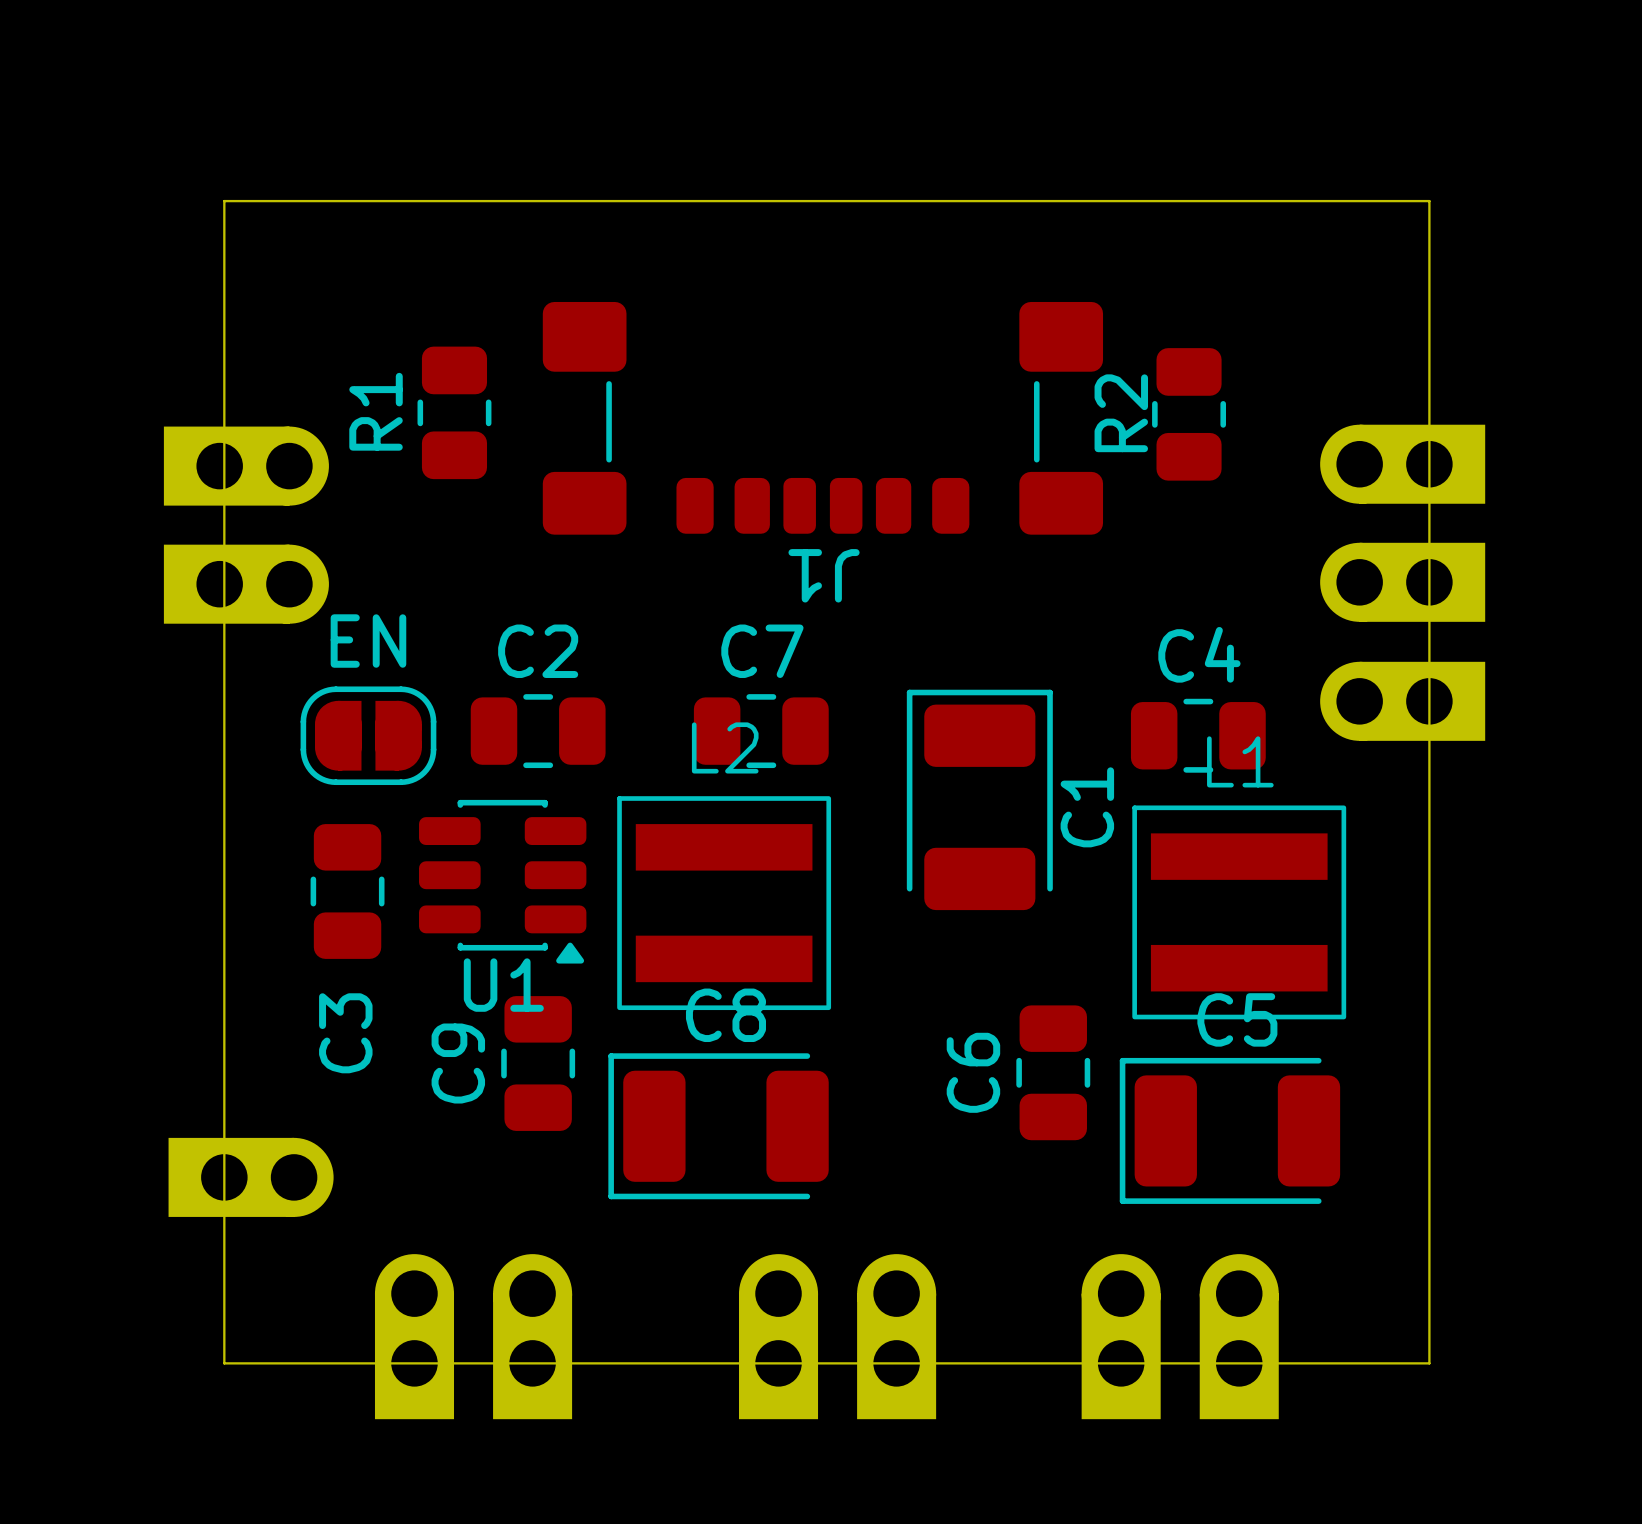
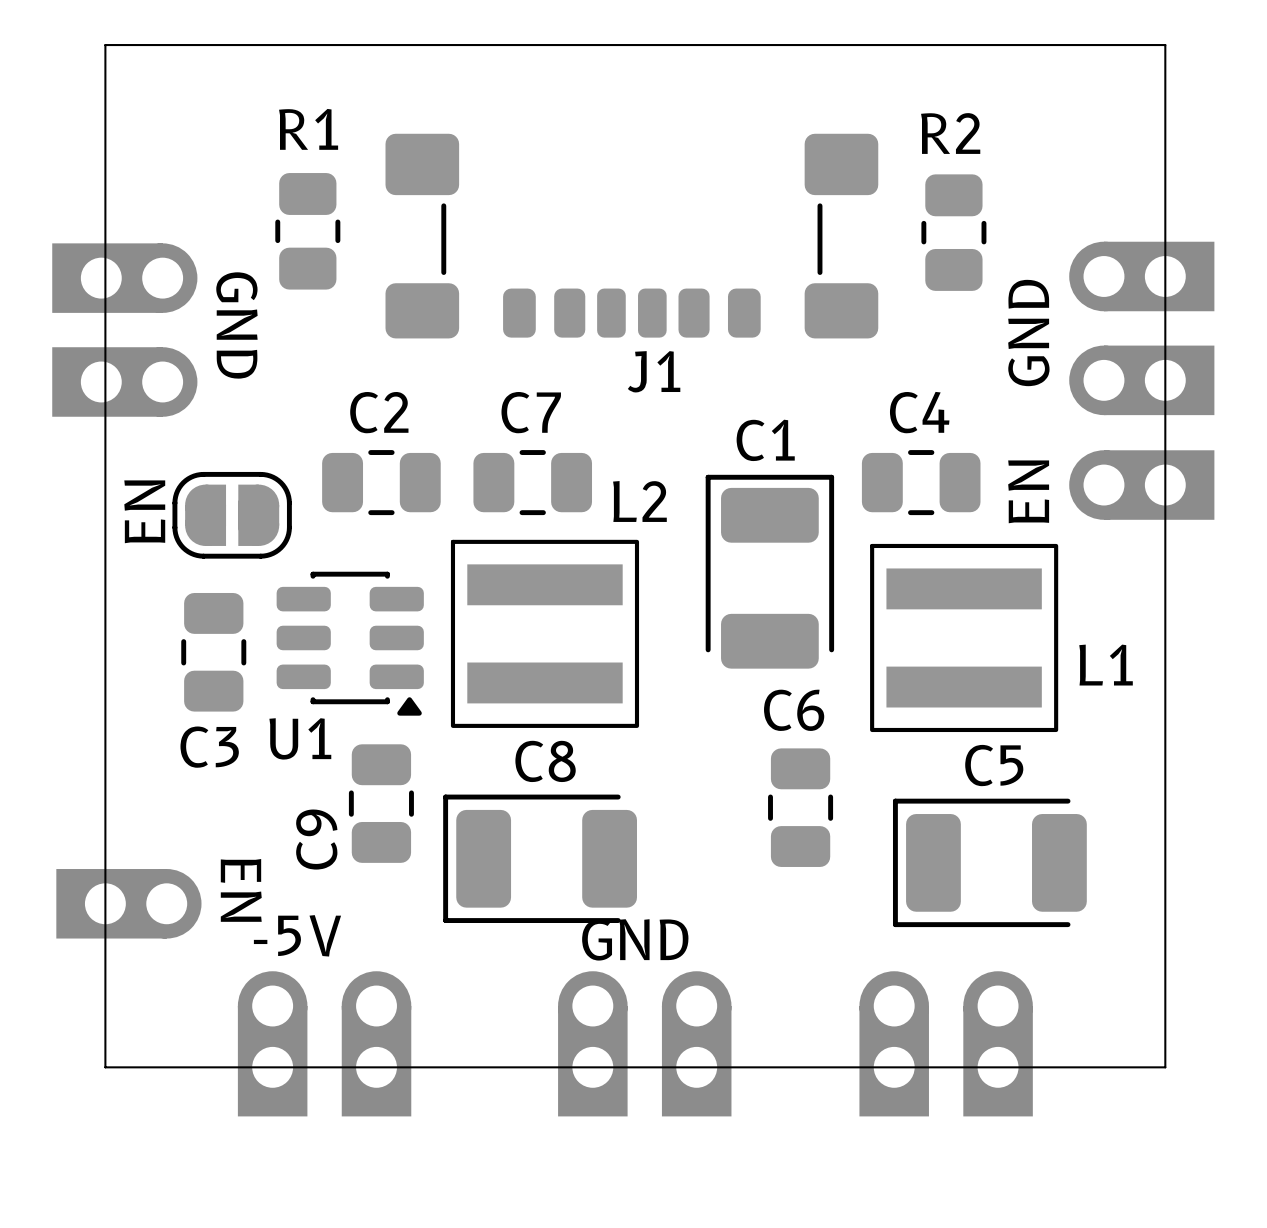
R1 name rotation: 0° (376, 411) -> 90° clockwise (308, 129)
R1 name position: R1 (376, 411) -> R1 (308, 129)
R2 name rotation: 0° (1121, 413) -> 90° clockwise (950, 133)
R2 name position: R2 (1121, 413) -> R2 (950, 133)
text: none -> GND (1028, 333)
text: none -> GND (236, 325)
J1 name rotation: 0° (824, 575) -> 180° (654, 371)
part text rotation: 0° (368, 641) -> 90° counterclockwise (144, 511)
part text position: EN (368, 641) -> EN (144, 511)
text: none -> EN (1028, 491)
C2 position: (538, 731) -> (381, 482)
C7 position: (761, 731) -> (532, 482)
C4 position: (1198, 735) -> (921, 482)
L2 name position: L2 (725, 747) -> L2 (639, 501)
L1 name position: L1 (1240, 761) -> L1 (1106, 665)
C1 name rotation: 0° (1087, 807) -> 90° clockwise (765, 440)
C1 name position: C1 (1087, 807) -> C1 (765, 440)
L2 position: (724, 903) -> (544, 633)
L1 position: (1239, 912) -> (964, 637)
U1 name position: U1 (503, 985) -> U1 (300, 738)
C3 name rotation: 0° (345, 1033) -> 90° clockwise (209, 747)
C9 name position: C9 (458, 1063) -> C9 (316, 839)
C6 name rotation: 0° (973, 1072) -> 90° clockwise (794, 710)
C6 name position: C6 (973, 1072) -> C6 (794, 710)
C6 position: (1053, 1072) -> (800, 807)
text: none -> EN (241, 890)
text: none -> -5V (297, 935)
text: none -> GND (635, 939)

